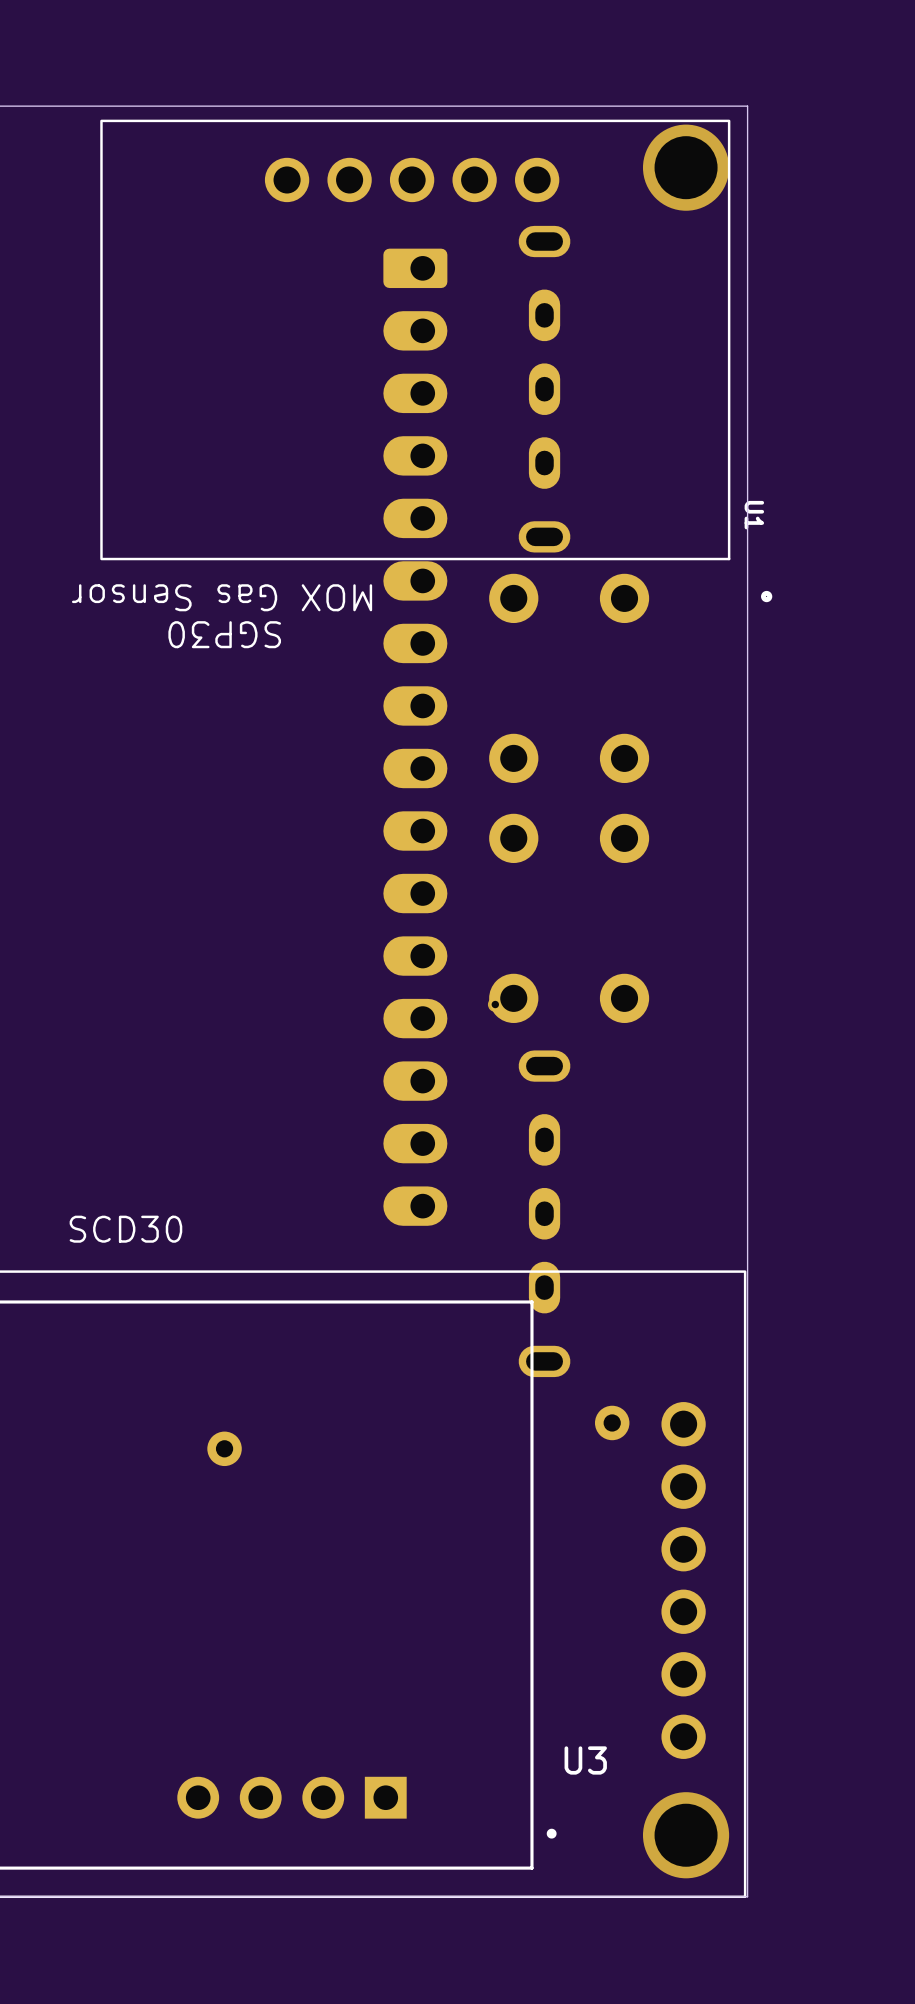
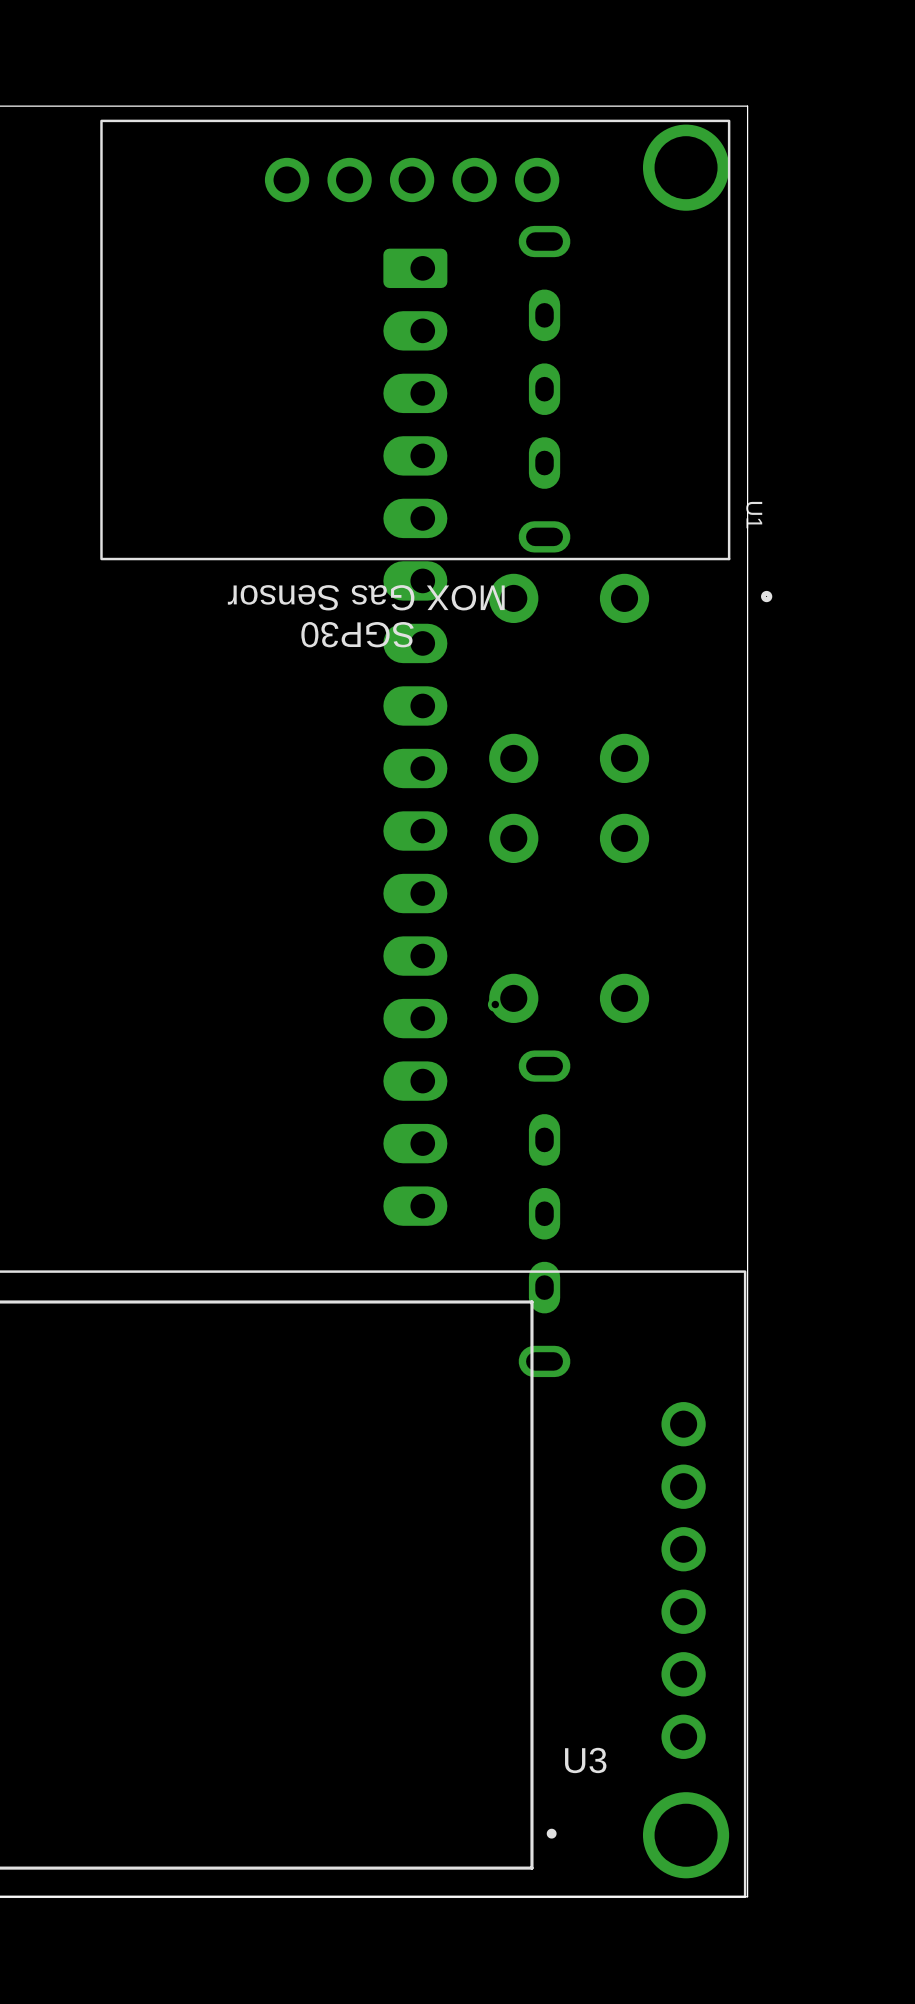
U1 text position: MOX Gas Sensor (222, 597) -> MOX Gas Sensor (366, 597)
U1 text position: SGP30 (224, 634) -> SGP30 (357, 634)
text: SCD30 (125, 1229) -> none
part: (612, 1422) -> none
part: (224, 1448) -> none
part: (291, 1797) -> none

